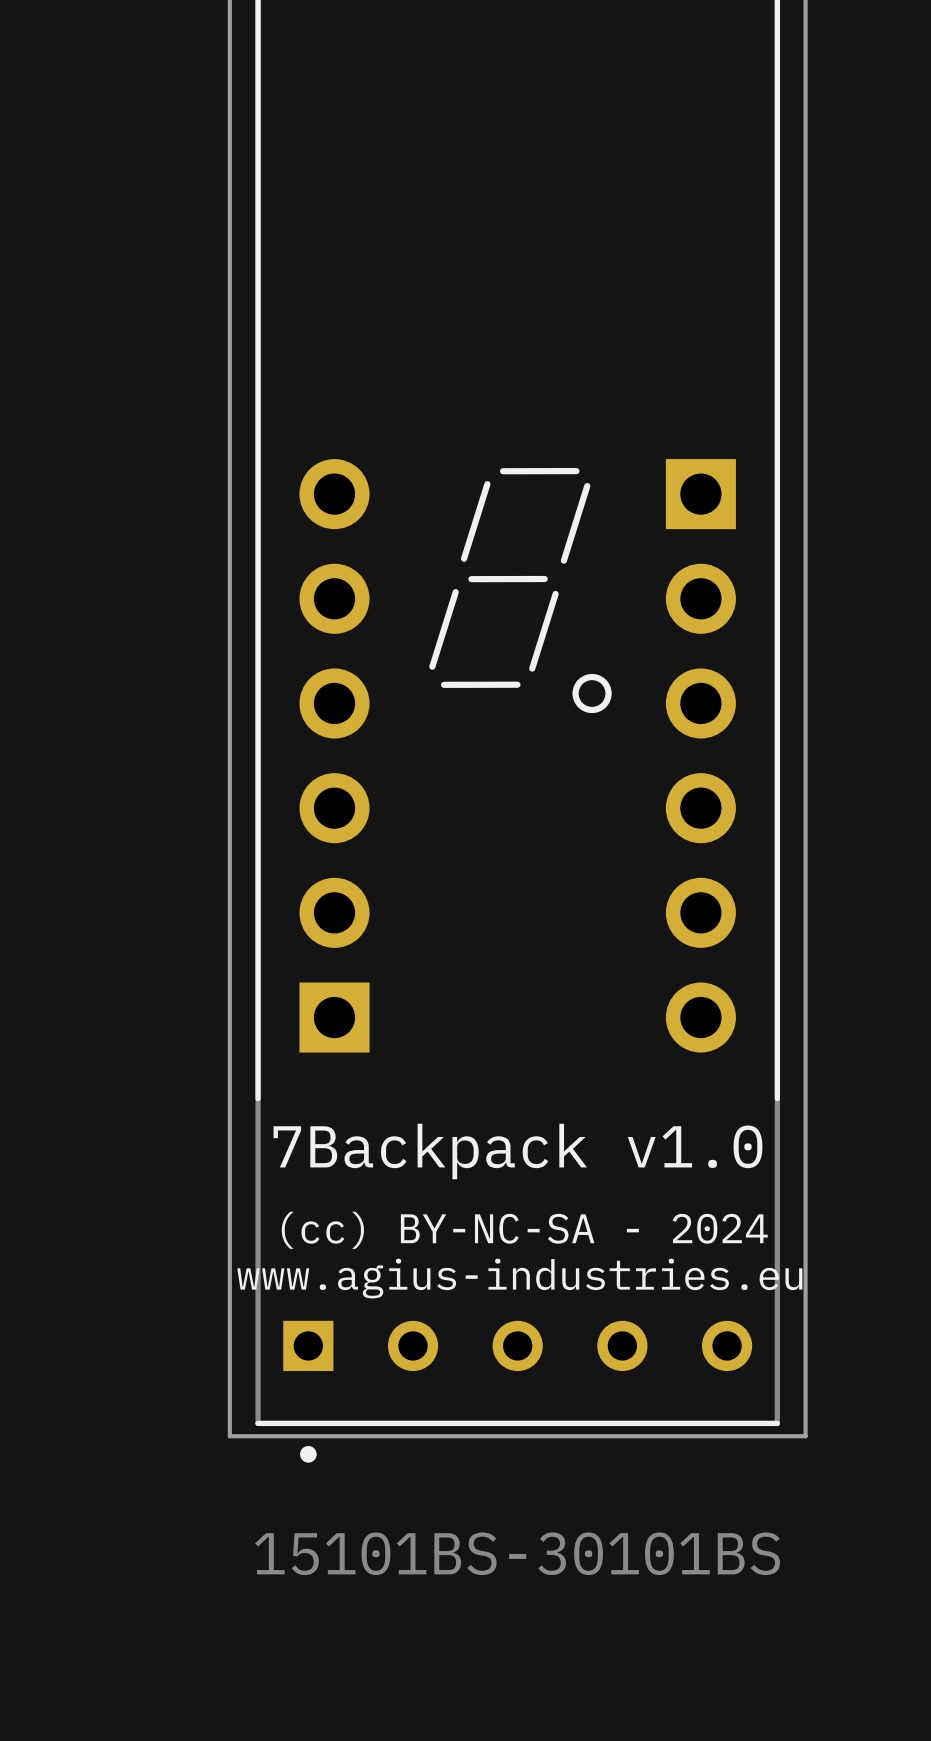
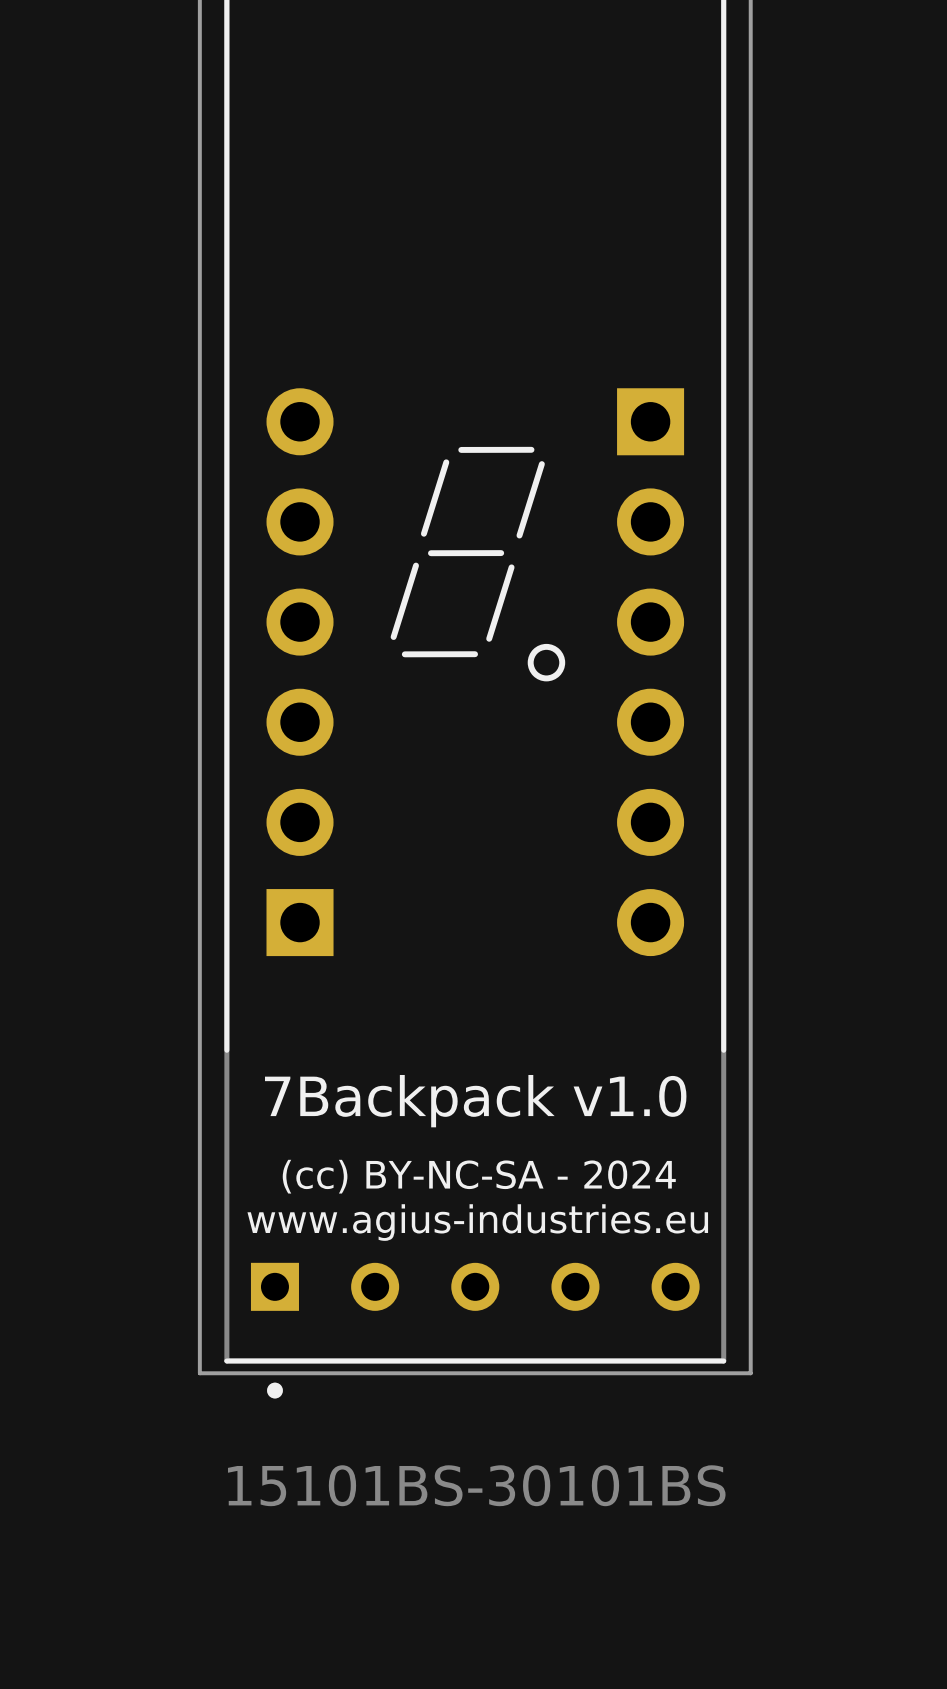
part position: (334, 755) -> (300, 672)
part position: (700, 755) -> (650, 672)

